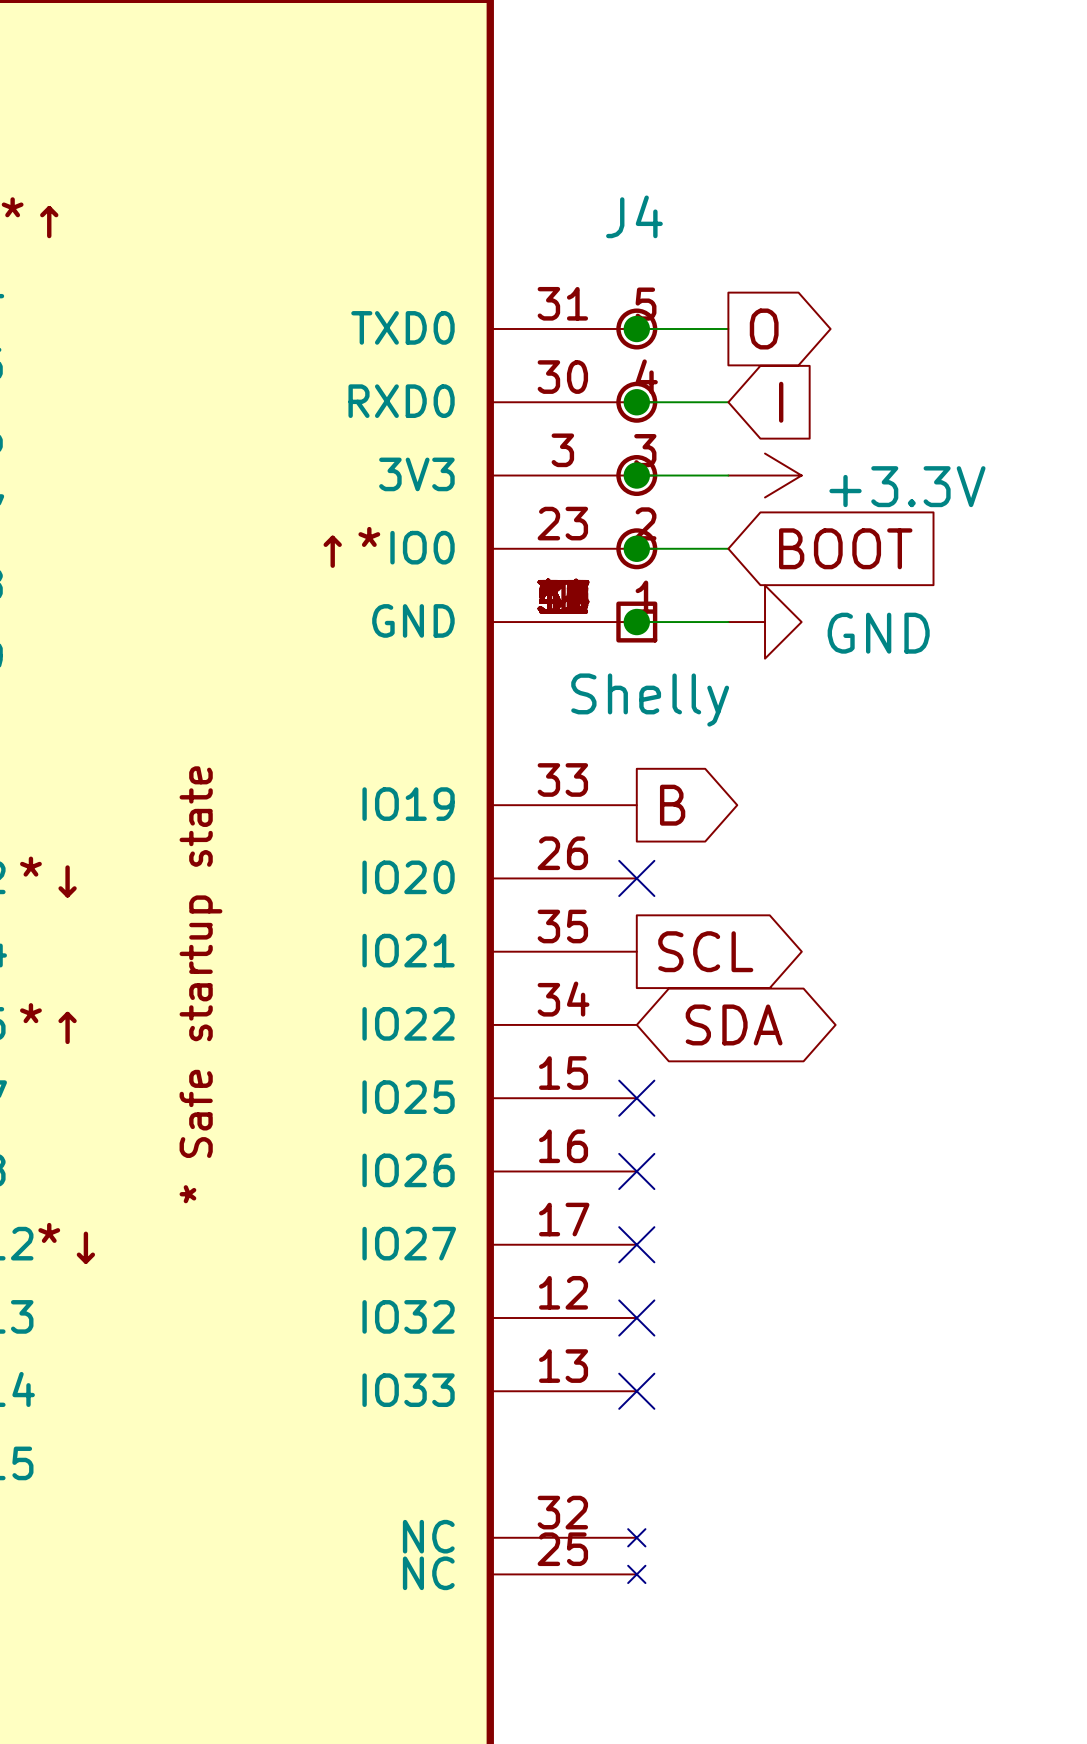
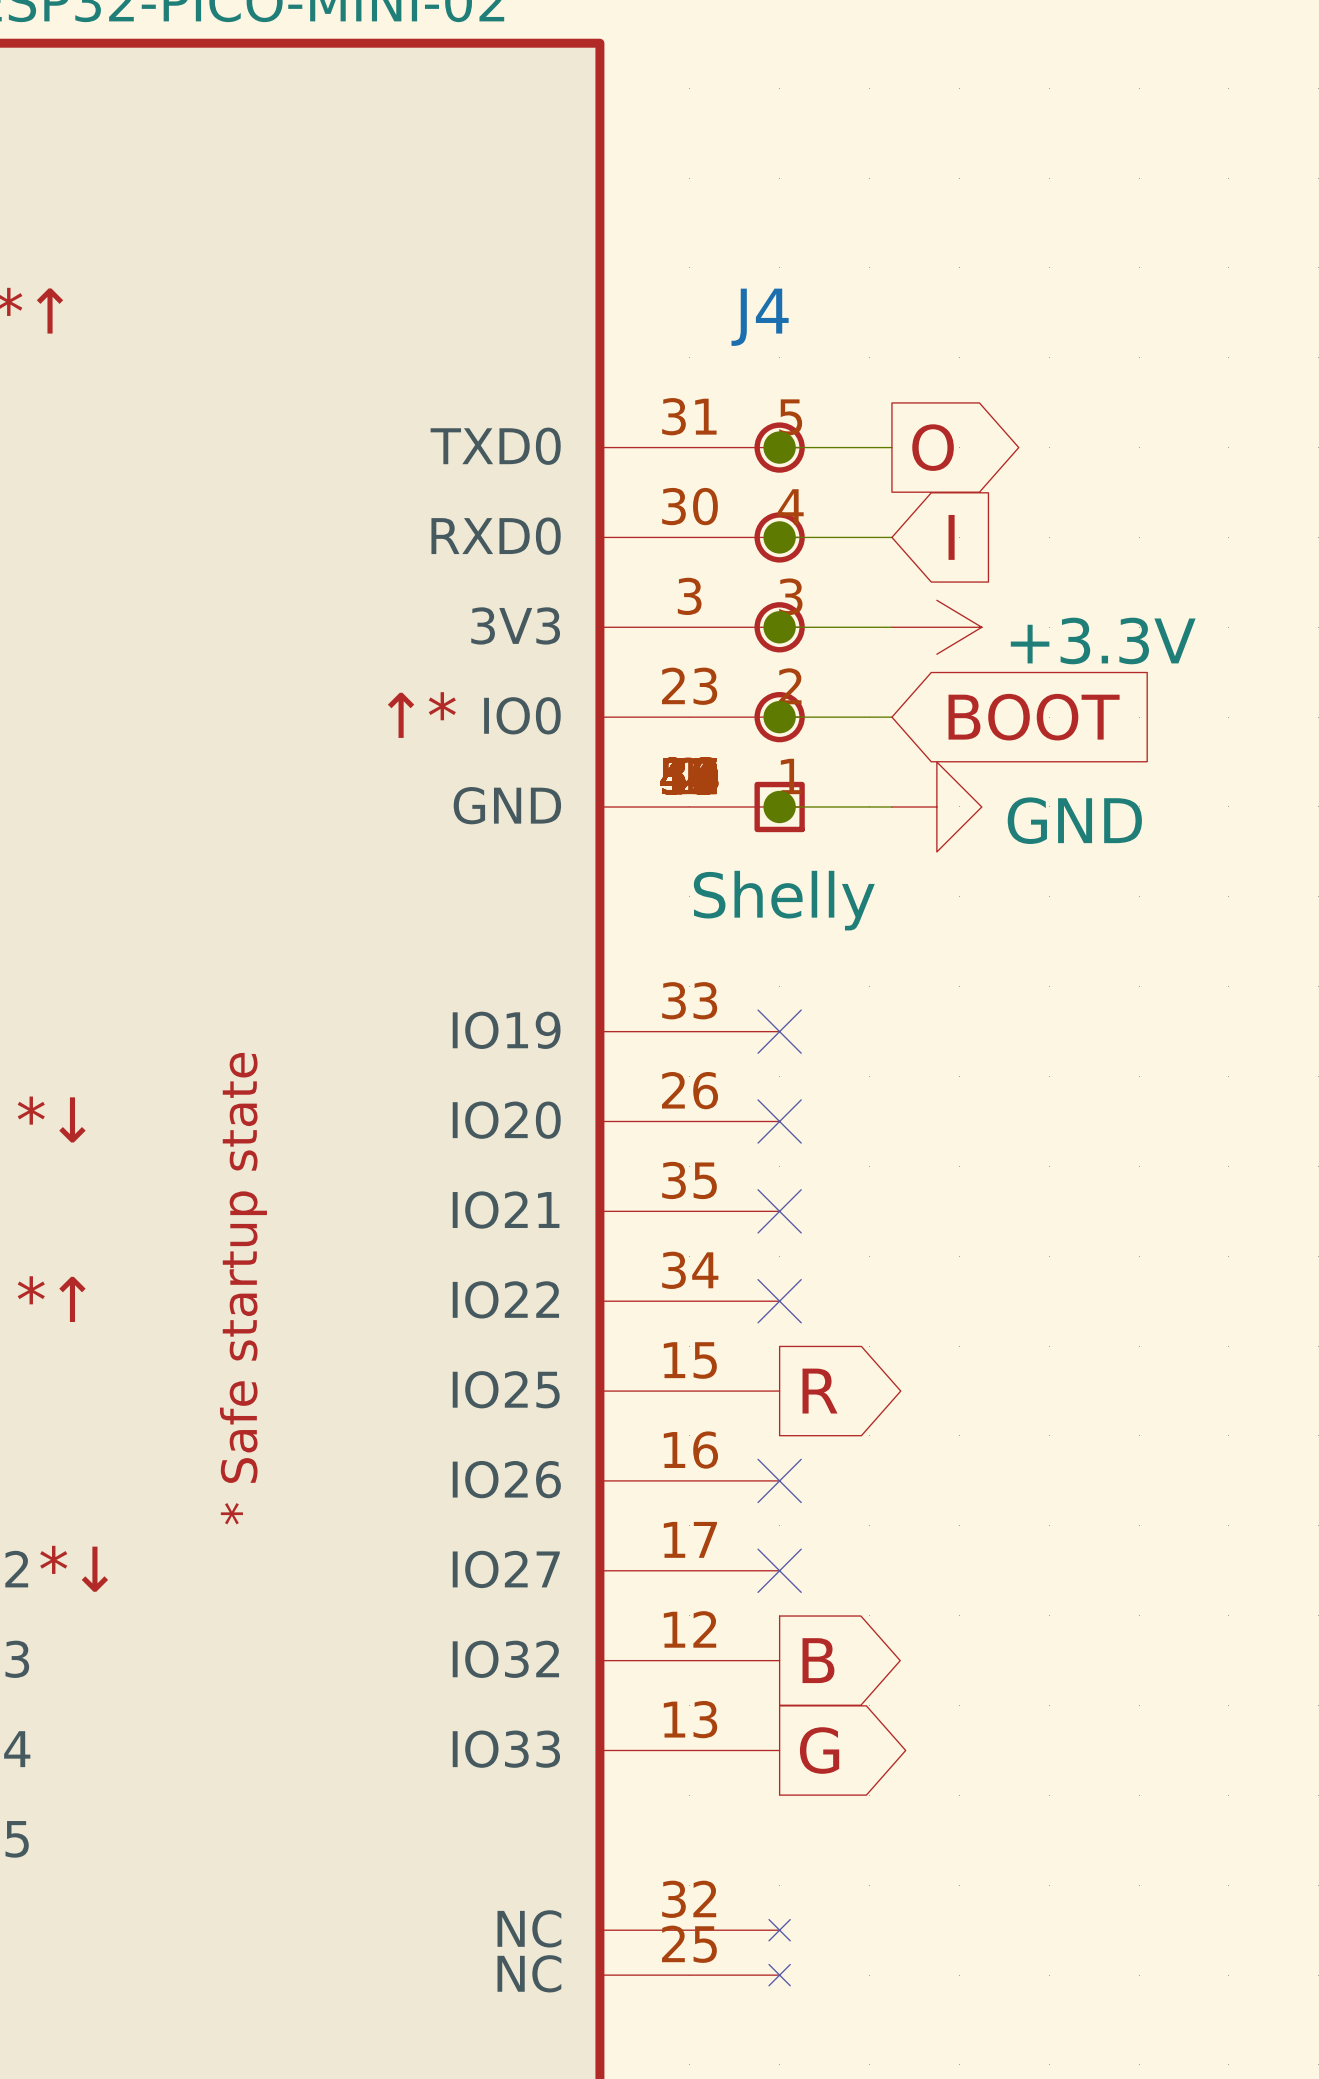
no-connect mark: none -> (779, 1031)
global label position: B (672, 805) -> B (818, 1660)
no-connect mark: none -> (779, 1211)
global label: SCL (705, 951) -> none
no-connect mark: none -> (779, 1301)
global label: SDA (734, 1024) -> none
no-connect mark: (636, 1098) -> none
global label: none -> R (820, 1391)
no-connect mark: (636, 1318) -> none
no-connect mark: (636, 1391) -> none
global label: none -> G (819, 1750)

